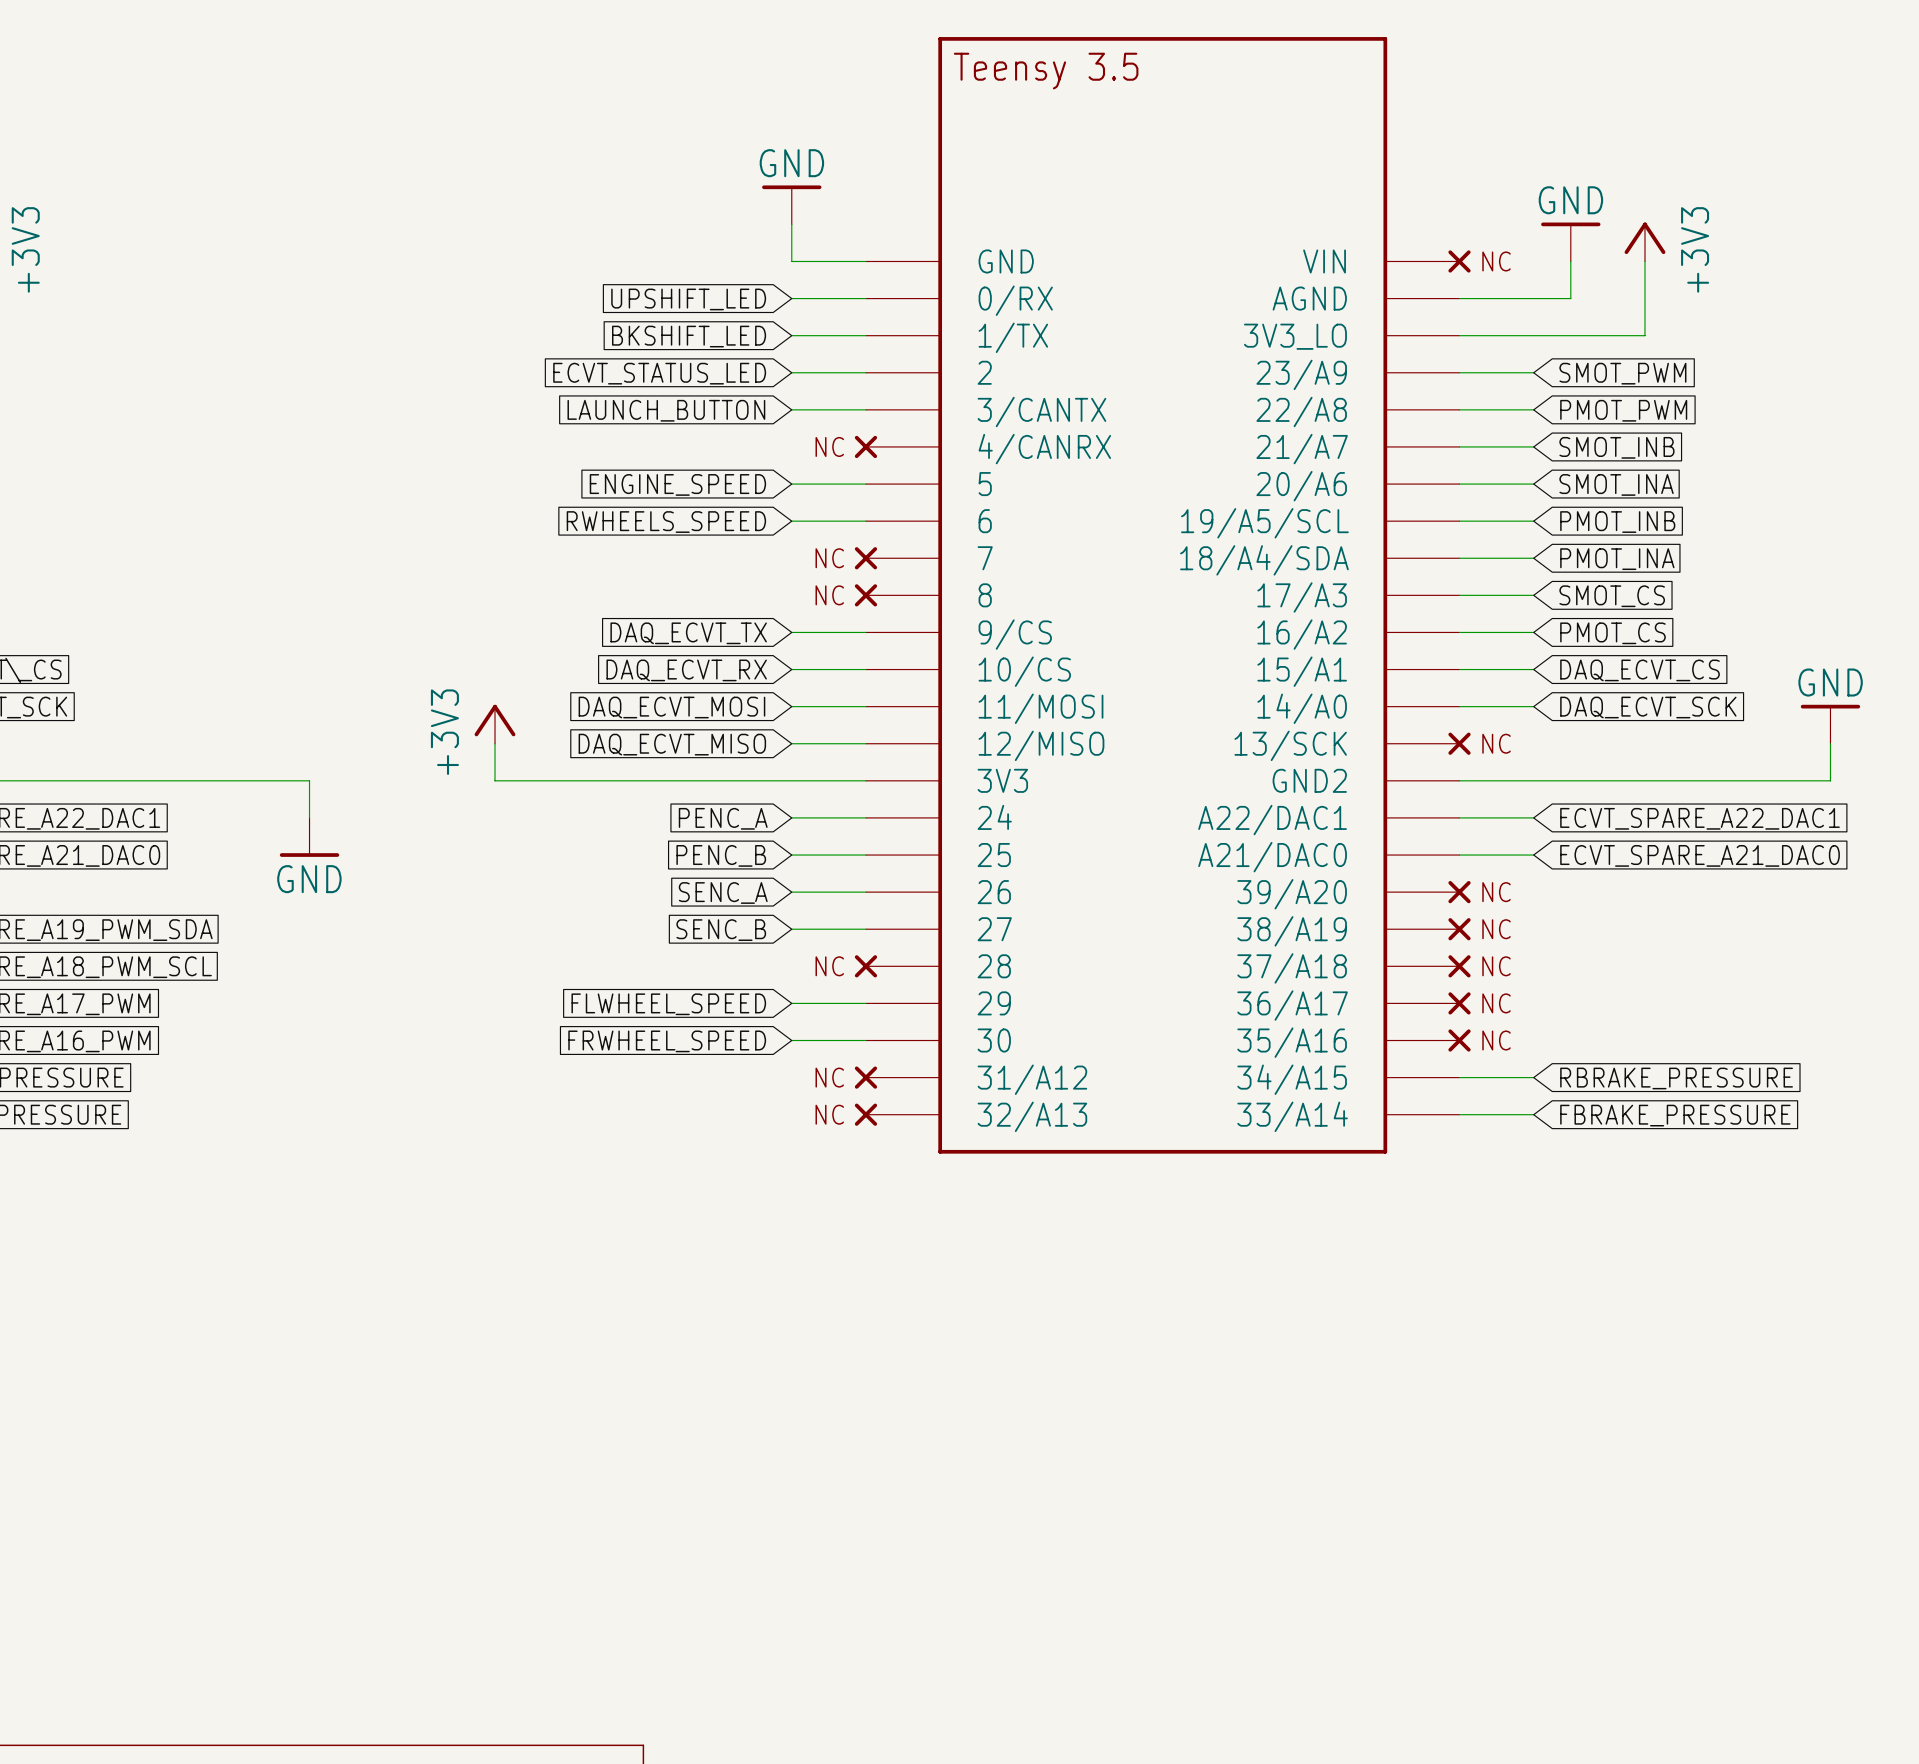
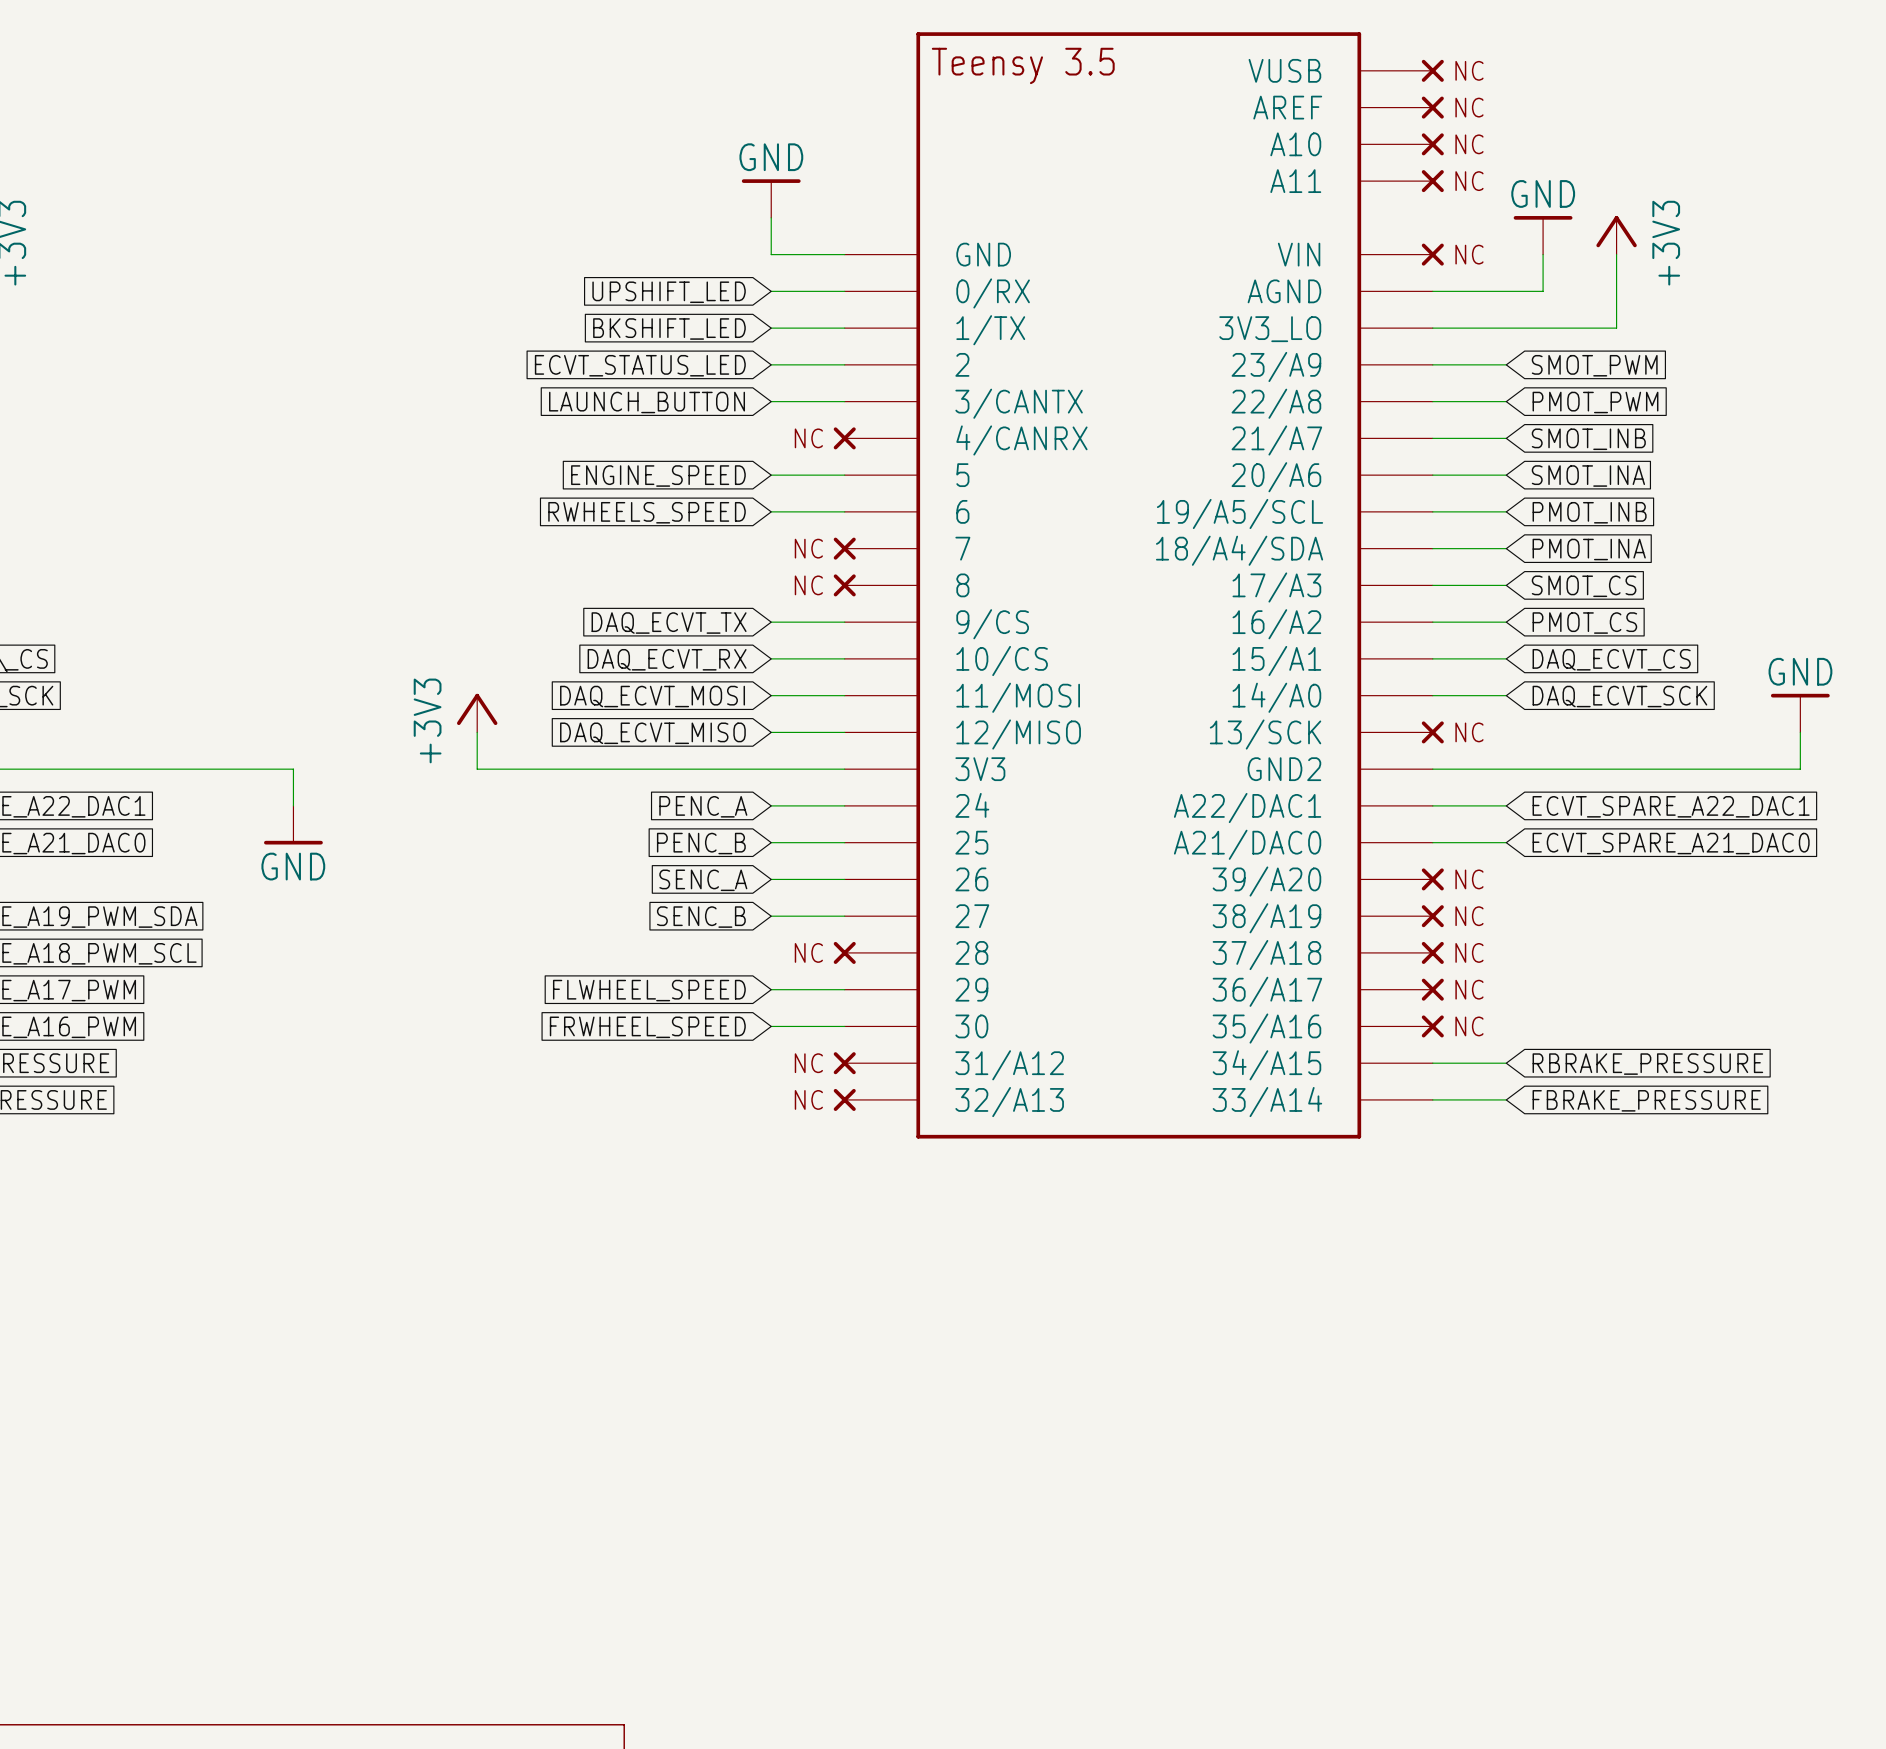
part symbol: [865, 37, 1460, 1154] -> [844, 32, 1433, 1139]
part: none -> (1432, 70)
part: none -> (1432, 107)
part: none -> (1432, 144)
part: none -> (1432, 181)

